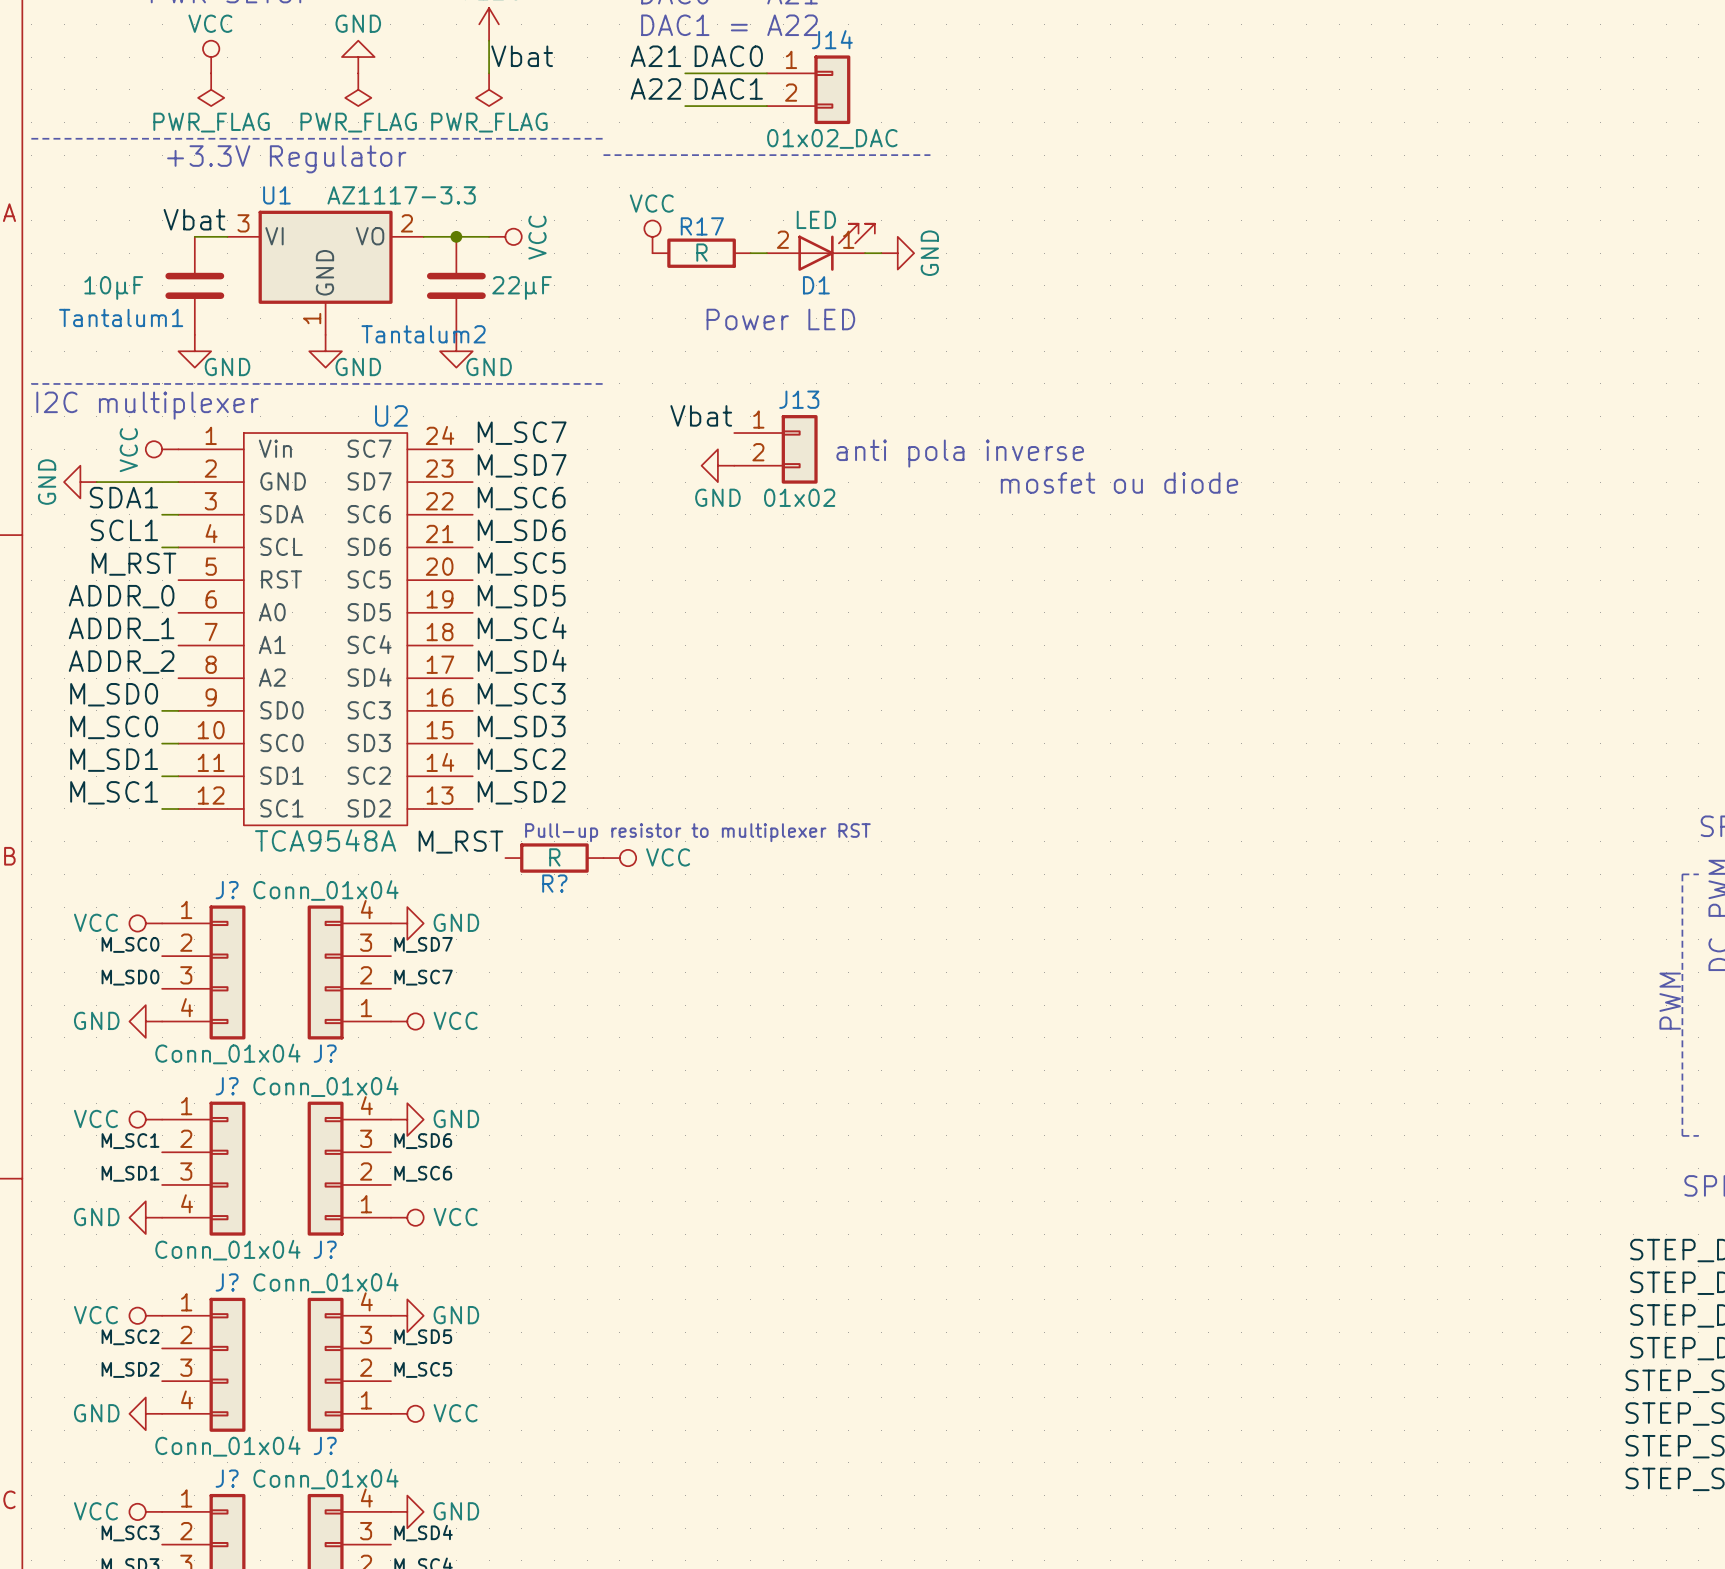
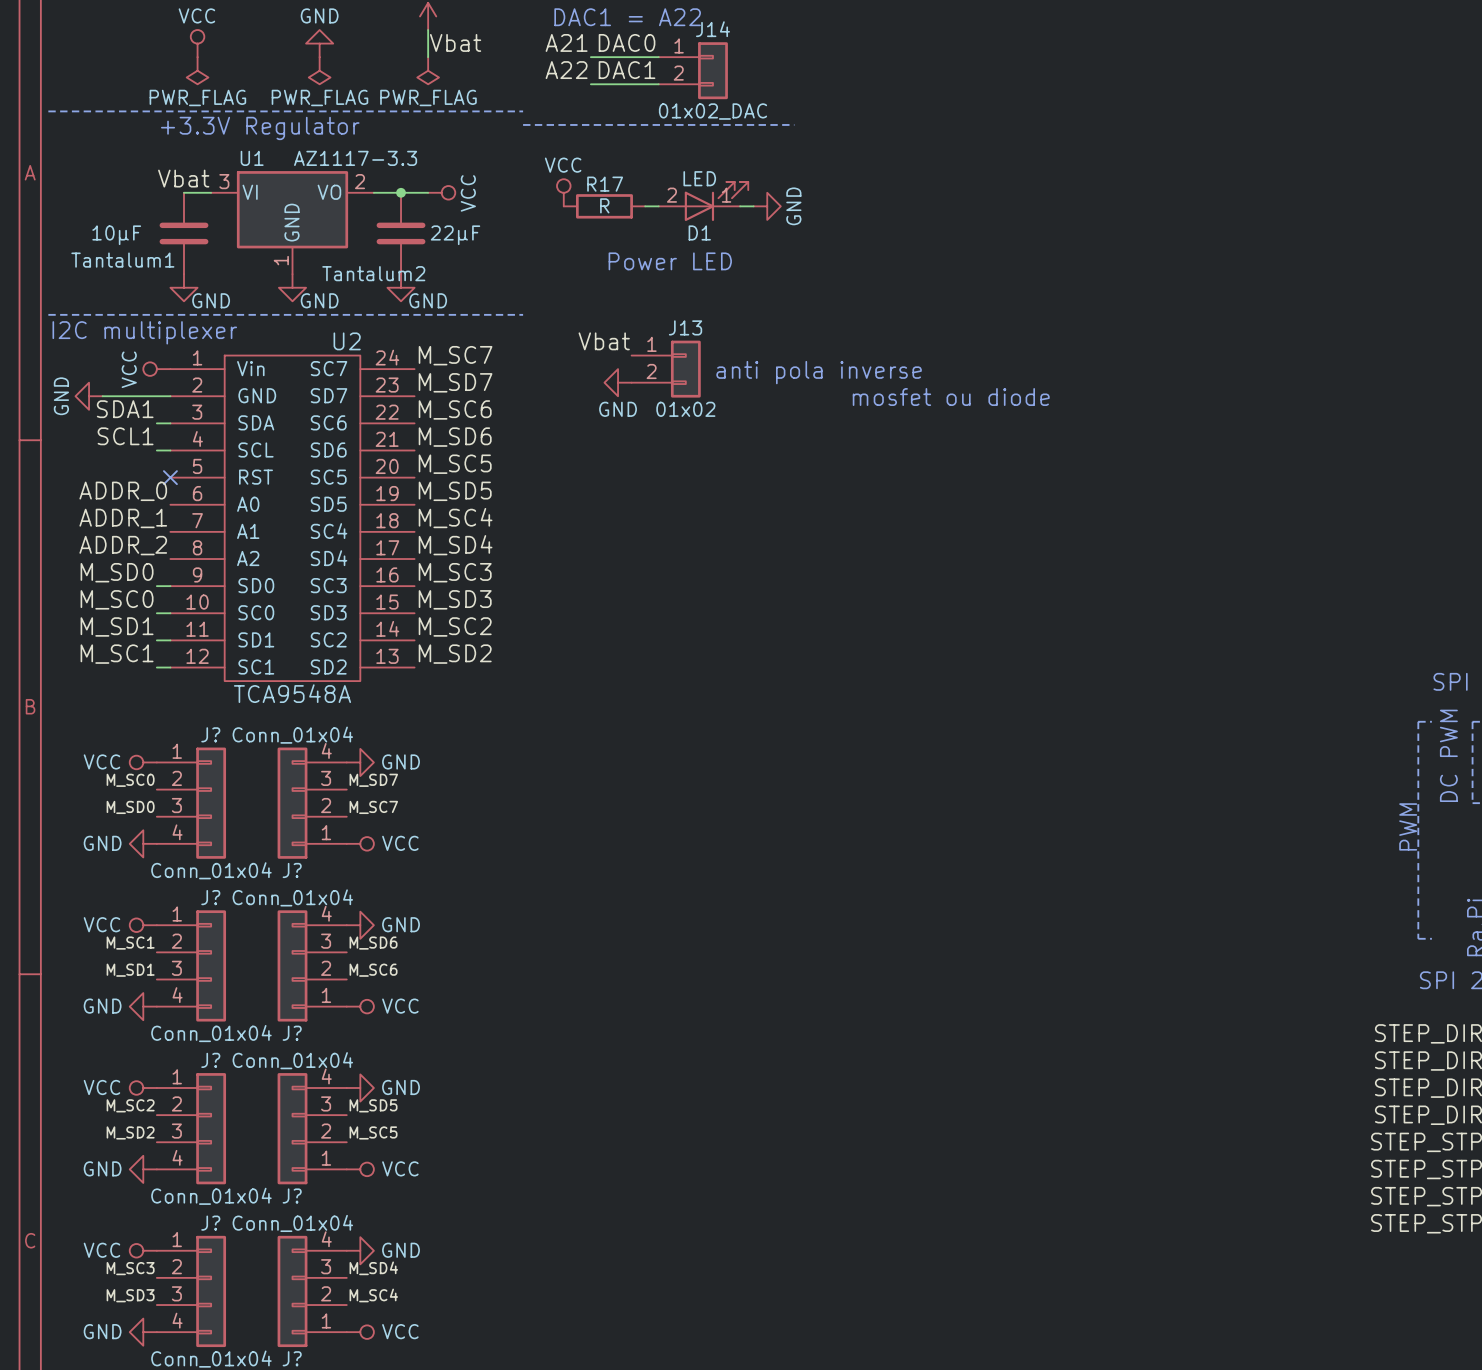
label: M_RST (134, 564) -> none
no-connect mark: none -> (170, 477)
text: Pull-up resistor to multiplexer RST (697, 832) -> none
label: M_RST (460, 842) -> none
R?: R (554, 858) -> none
power symbol: VCC (619, 858) -> none

